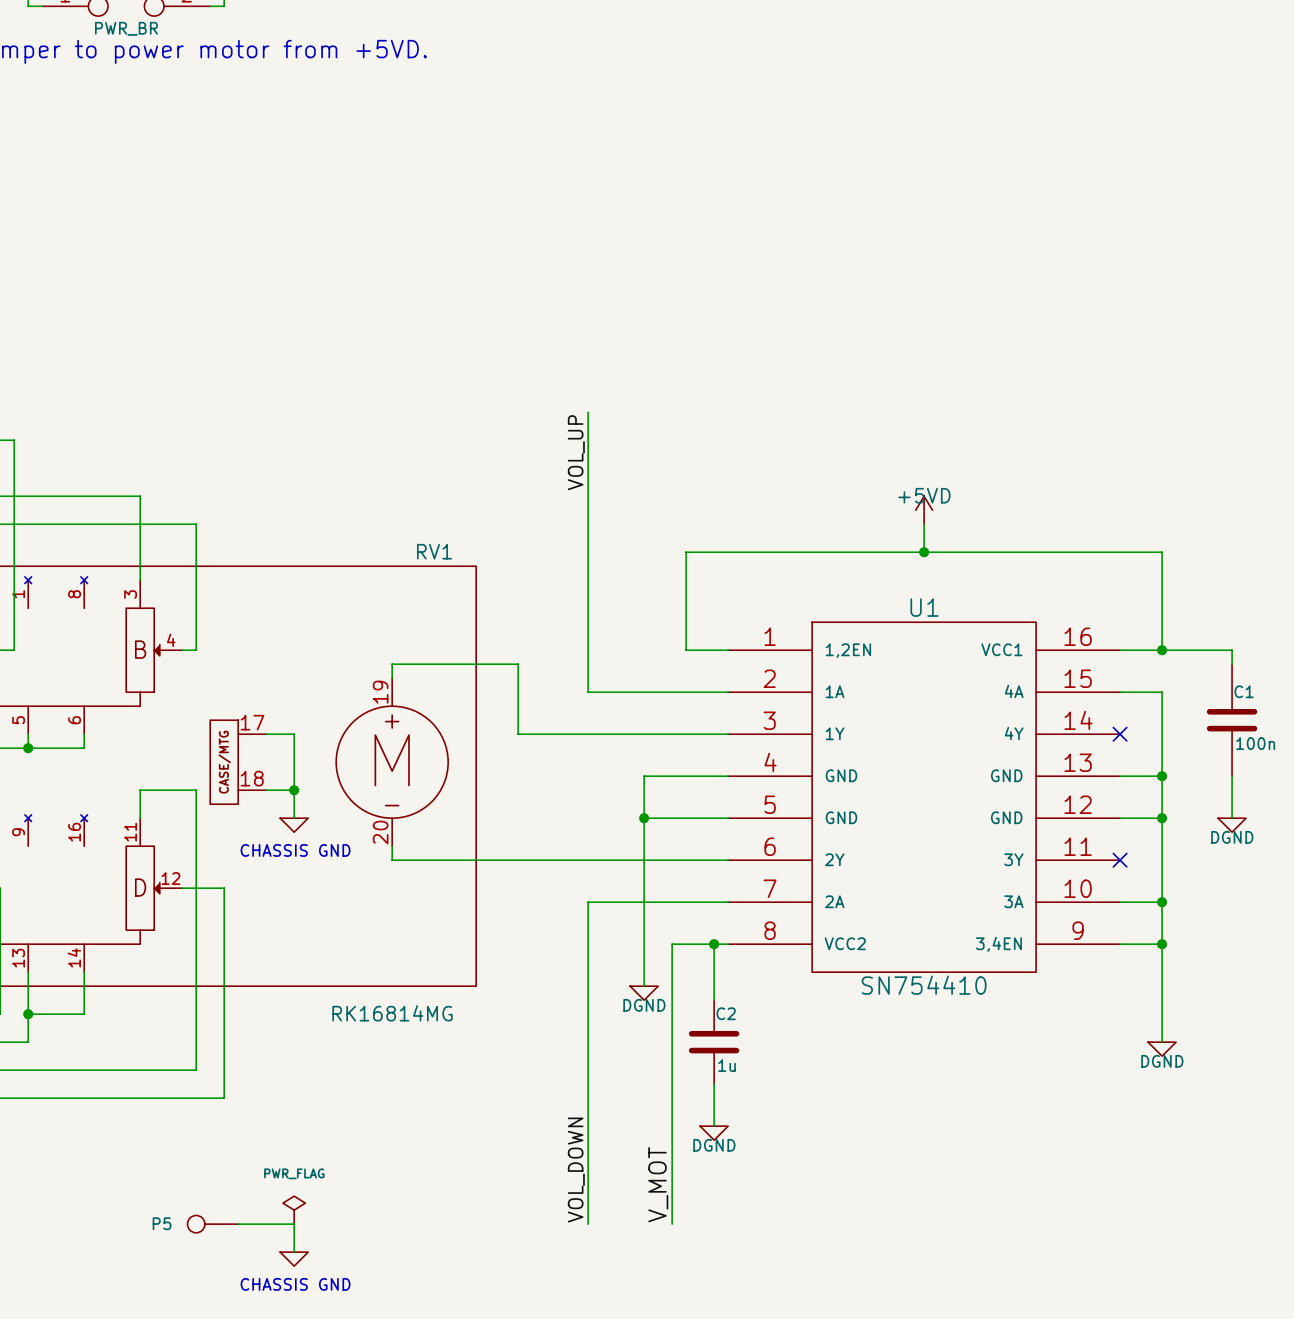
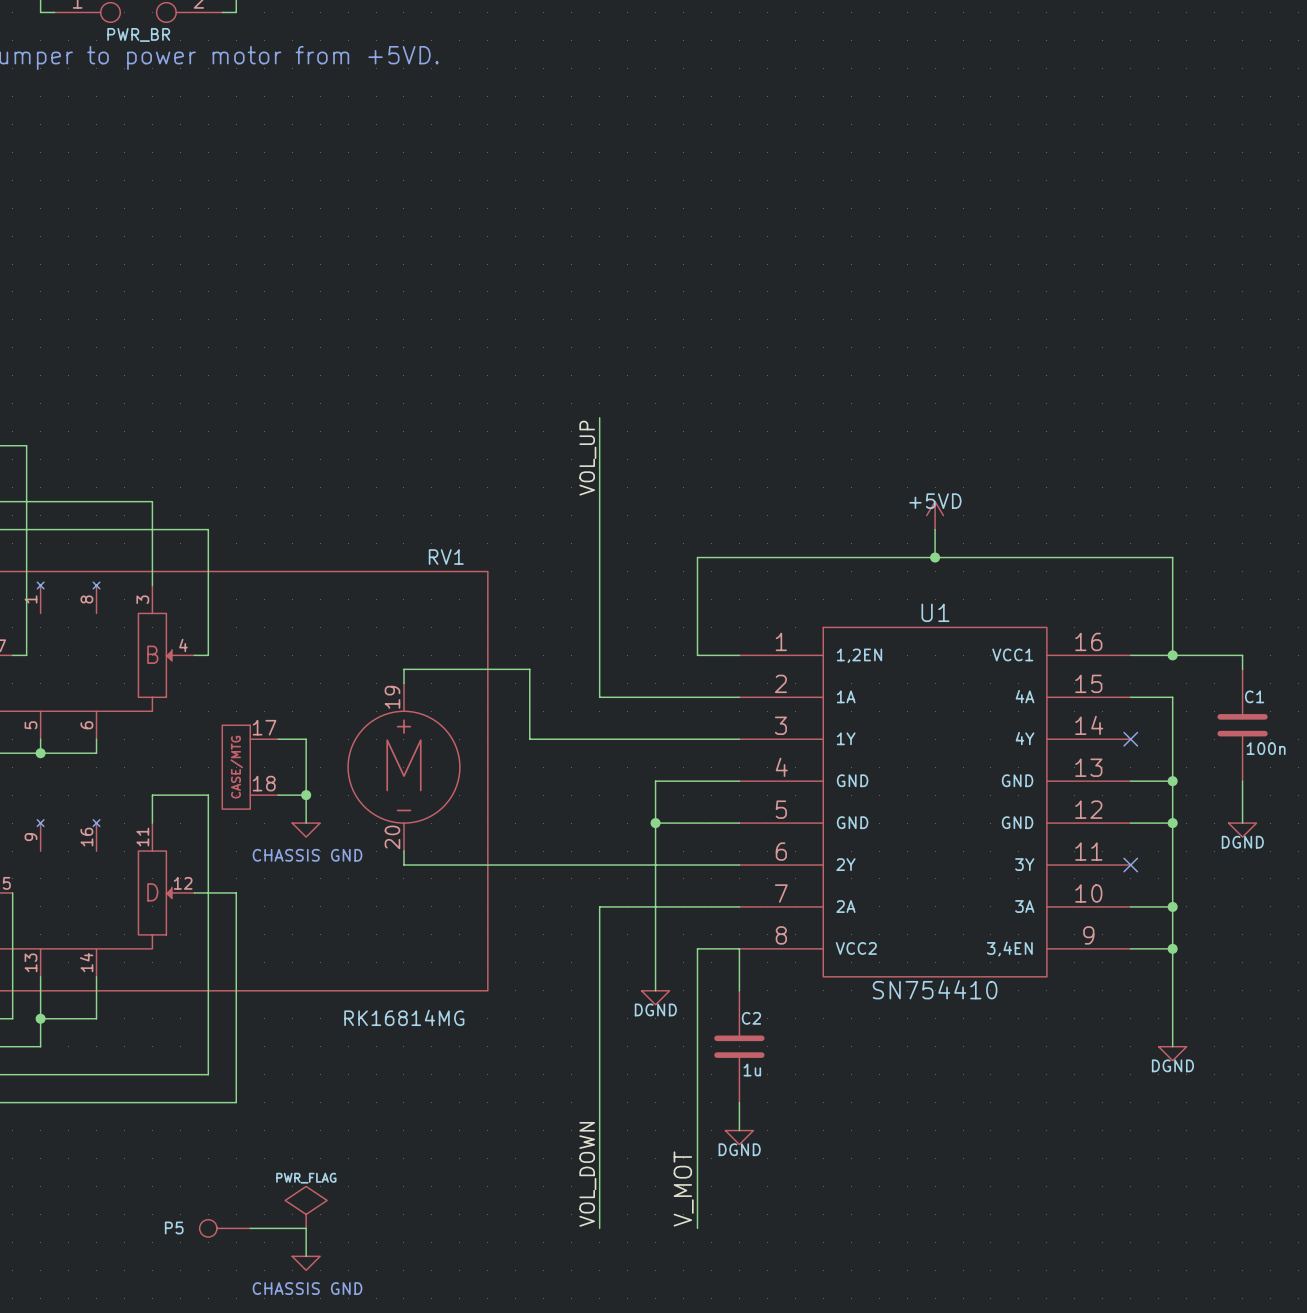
wire: (686, 944) (672, 944) (672, 1224) -> (697, 948) (697, 1228)
wire: (714, 944) (714, 1000) -> none
junction: (714, 944) -> none
C2 symbol: [688, 1000, 740, 1085] -> [714, 990, 765, 1103]
wire: (714, 1084) (714, 1126) -> (739, 948) (739, 990)
wire: none -> (739, 1102) (739, 1130)
power symbol position: DGND (714, 1133) -> DGND (739, 1137)
label position: V_MOT (658, 1184) -> V_MOT (683, 1188)
power symbol shape: [282, 1196, 306, 1225] -> [285, 1186, 328, 1229]

